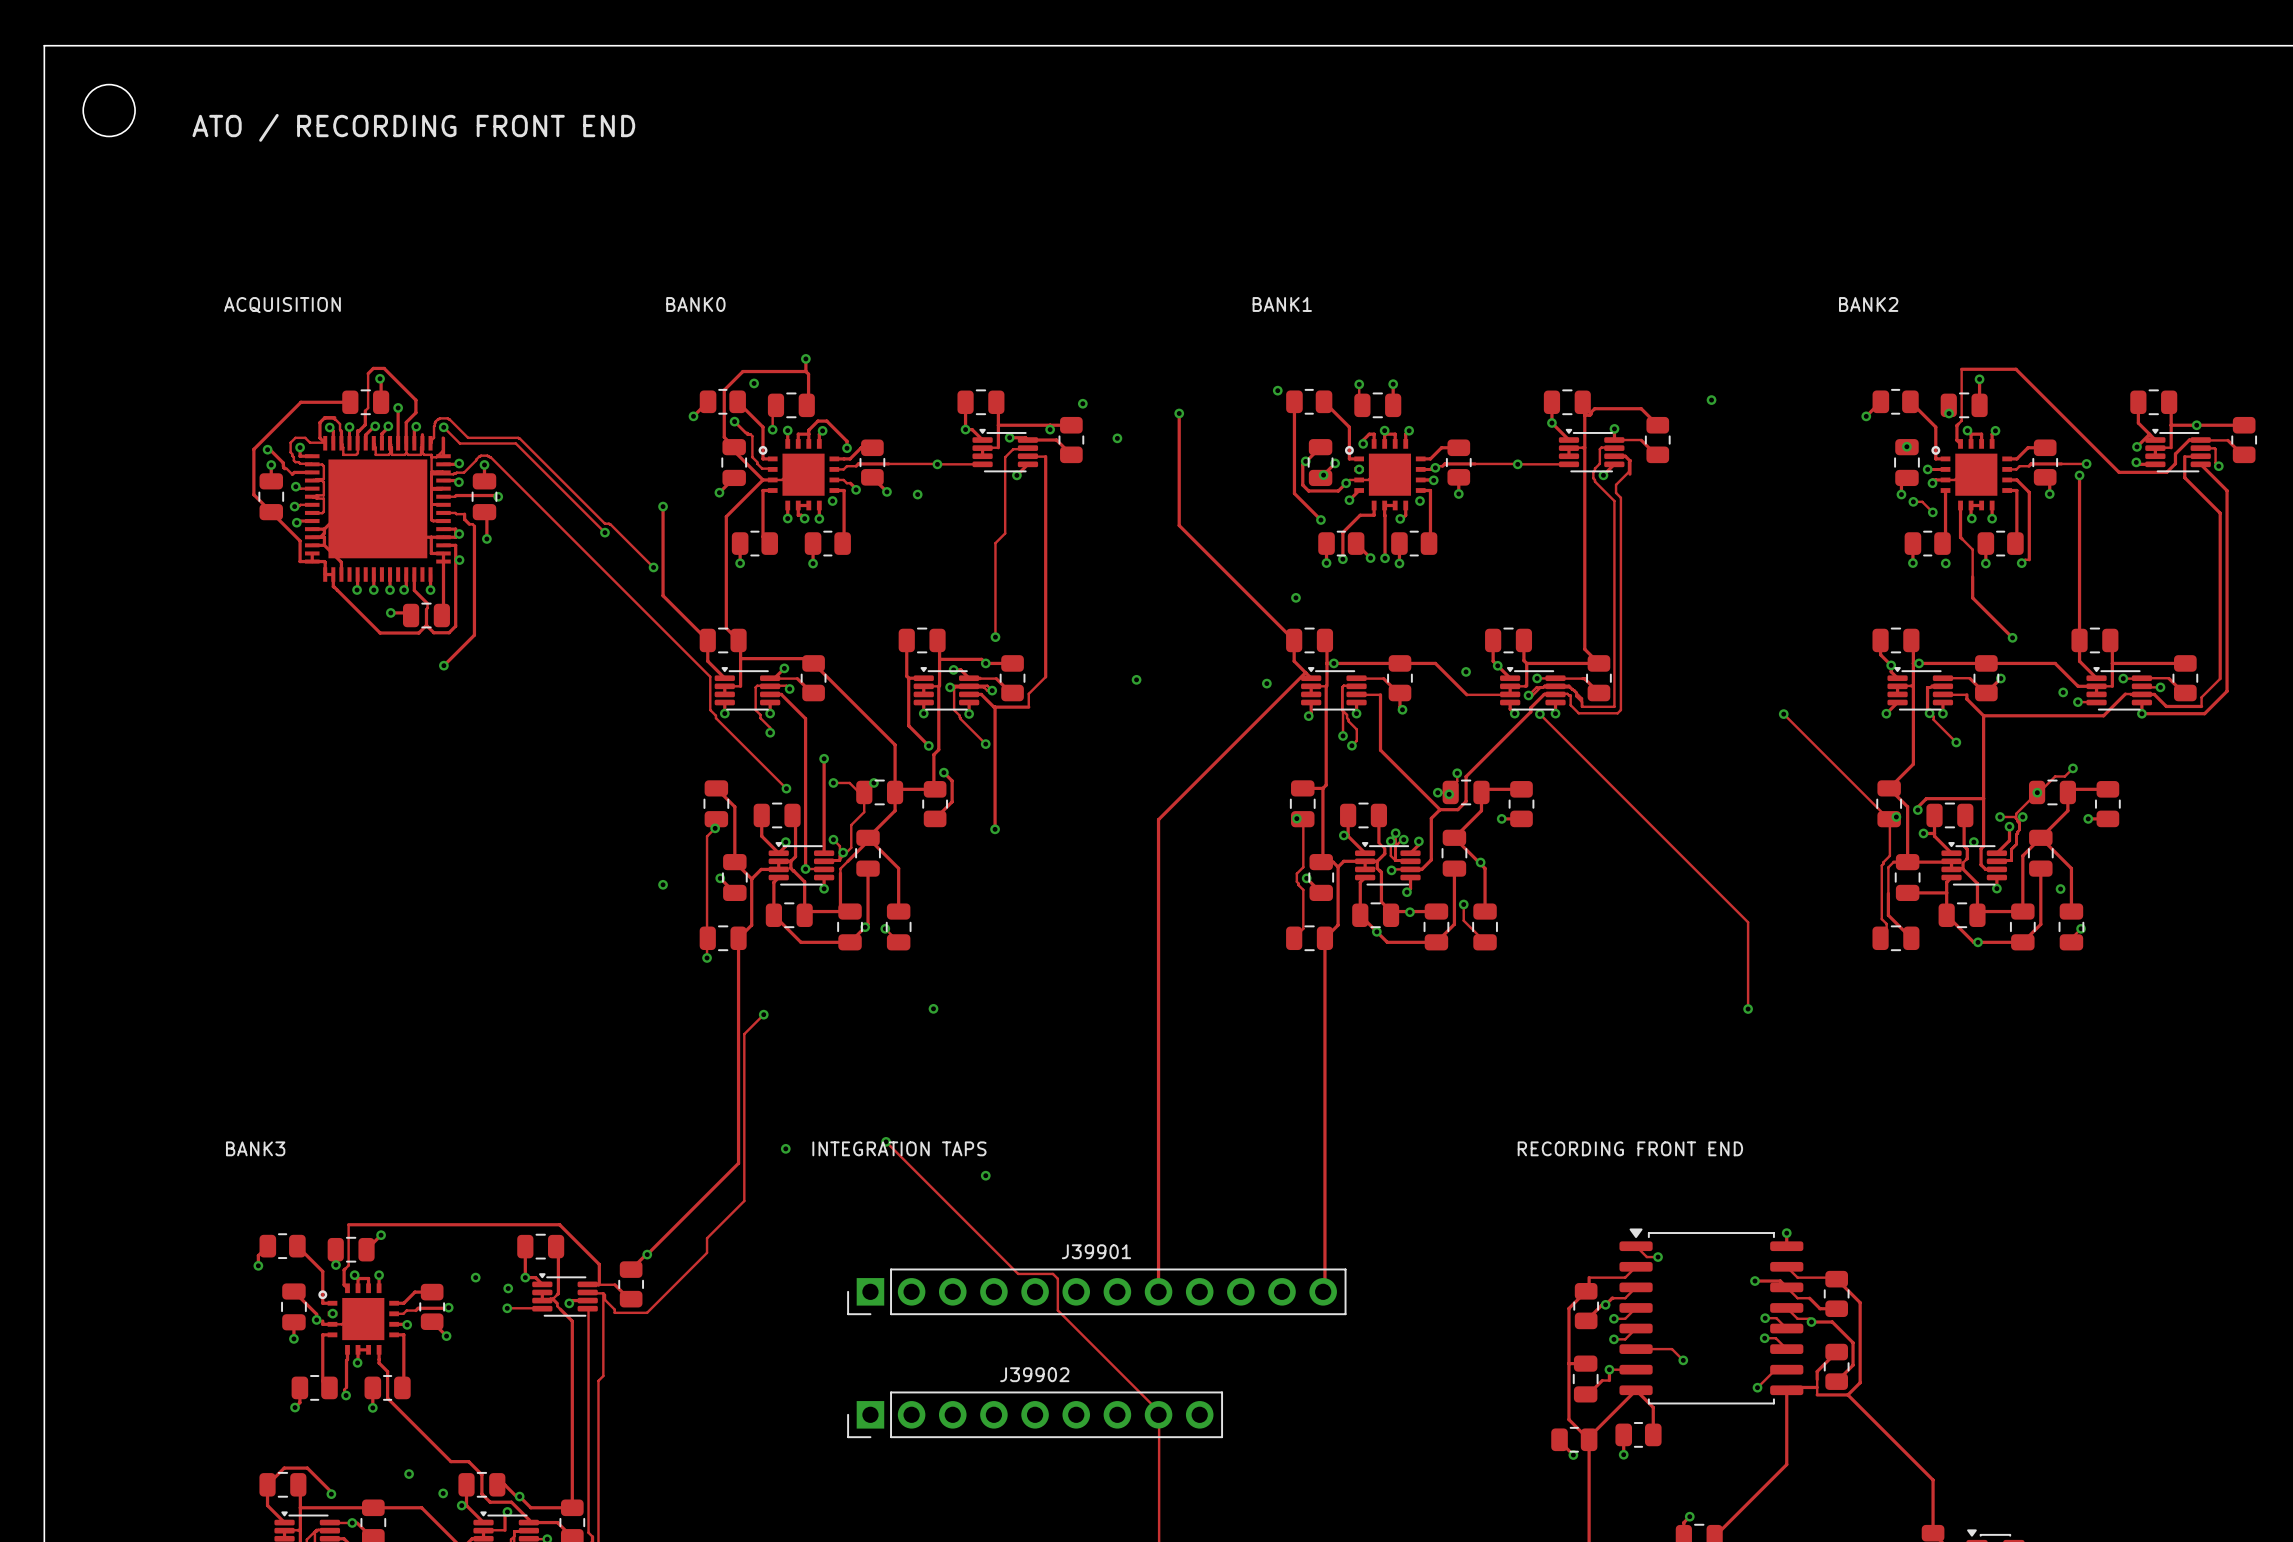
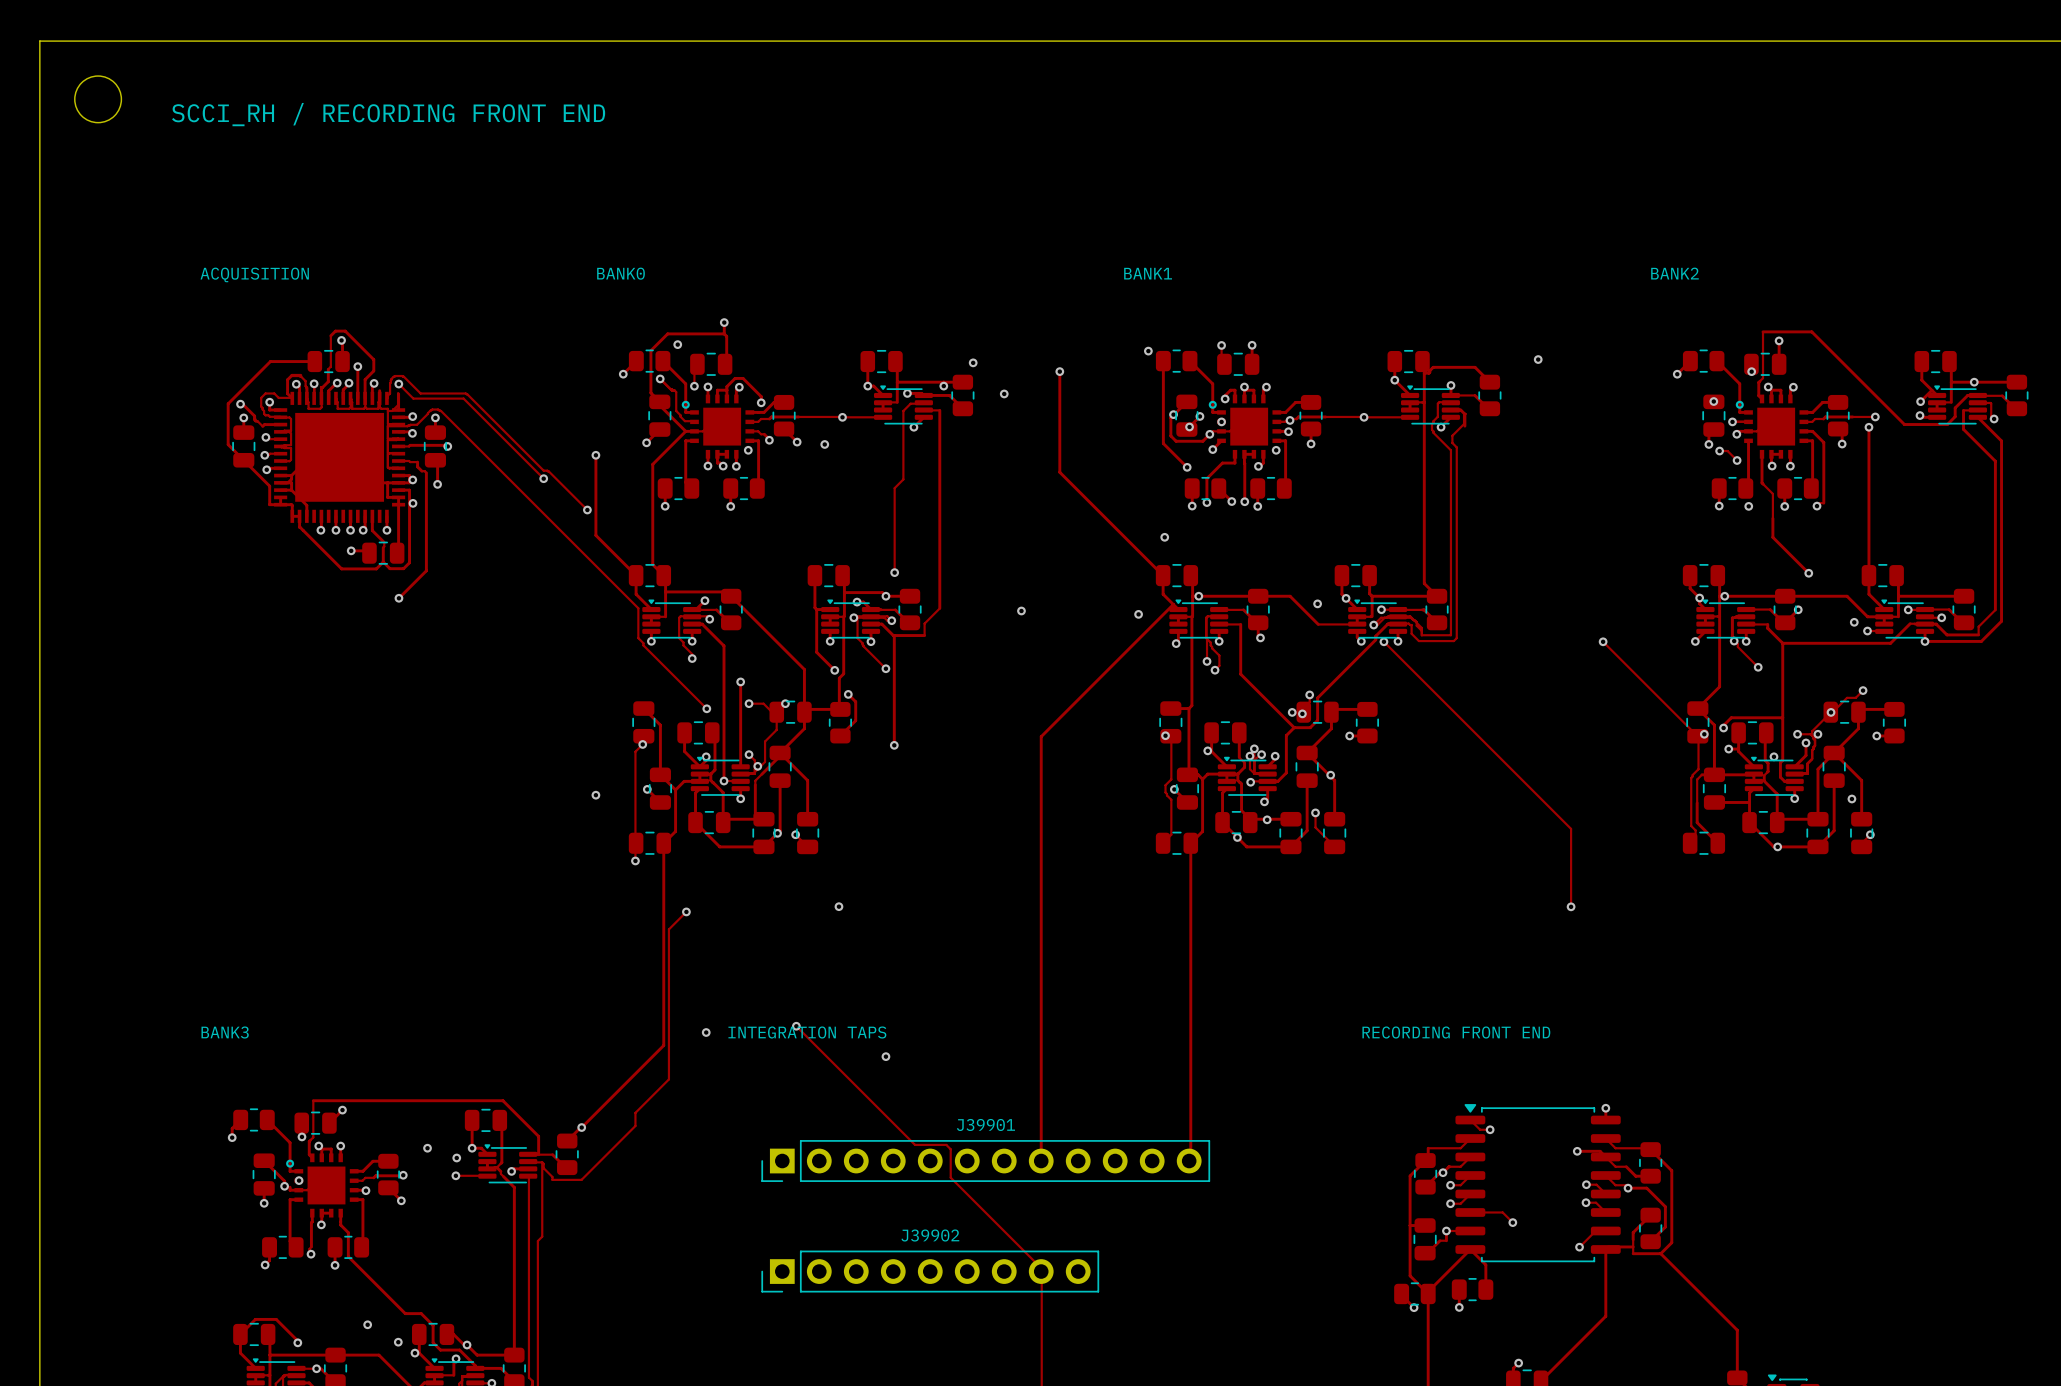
text: ATO / RECORDING FRONT END (413, 127) -> SCCI_RH / RECORDING FRONT END (388, 114)

